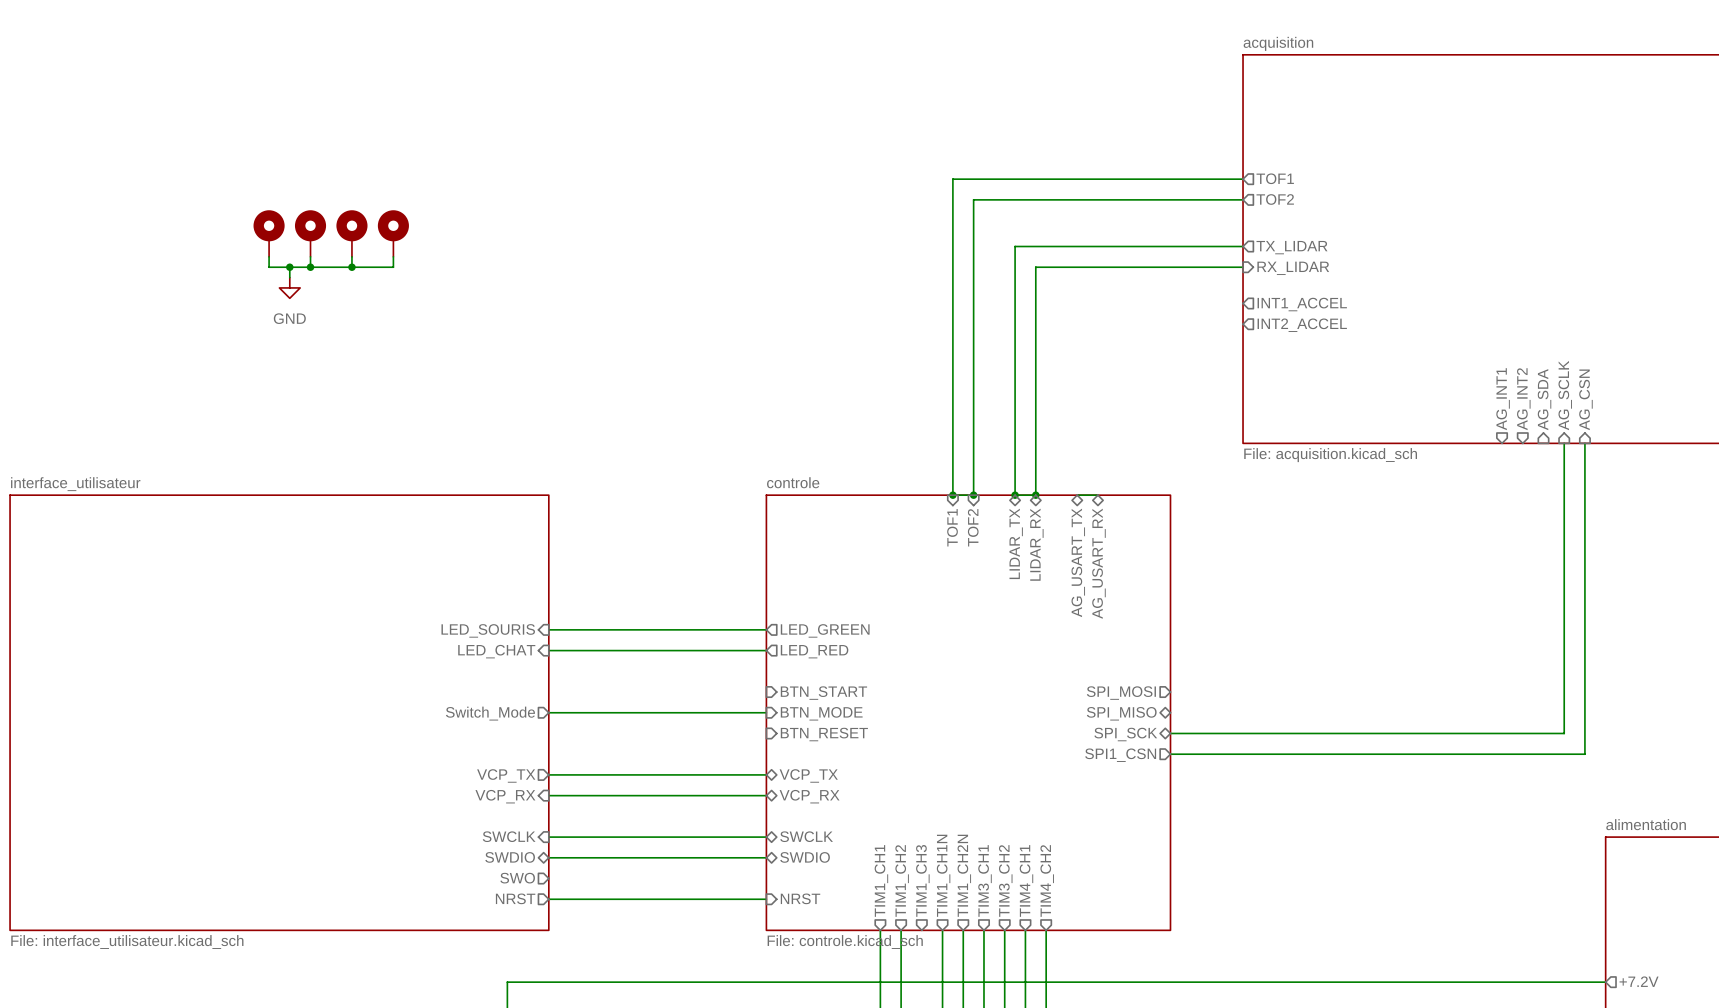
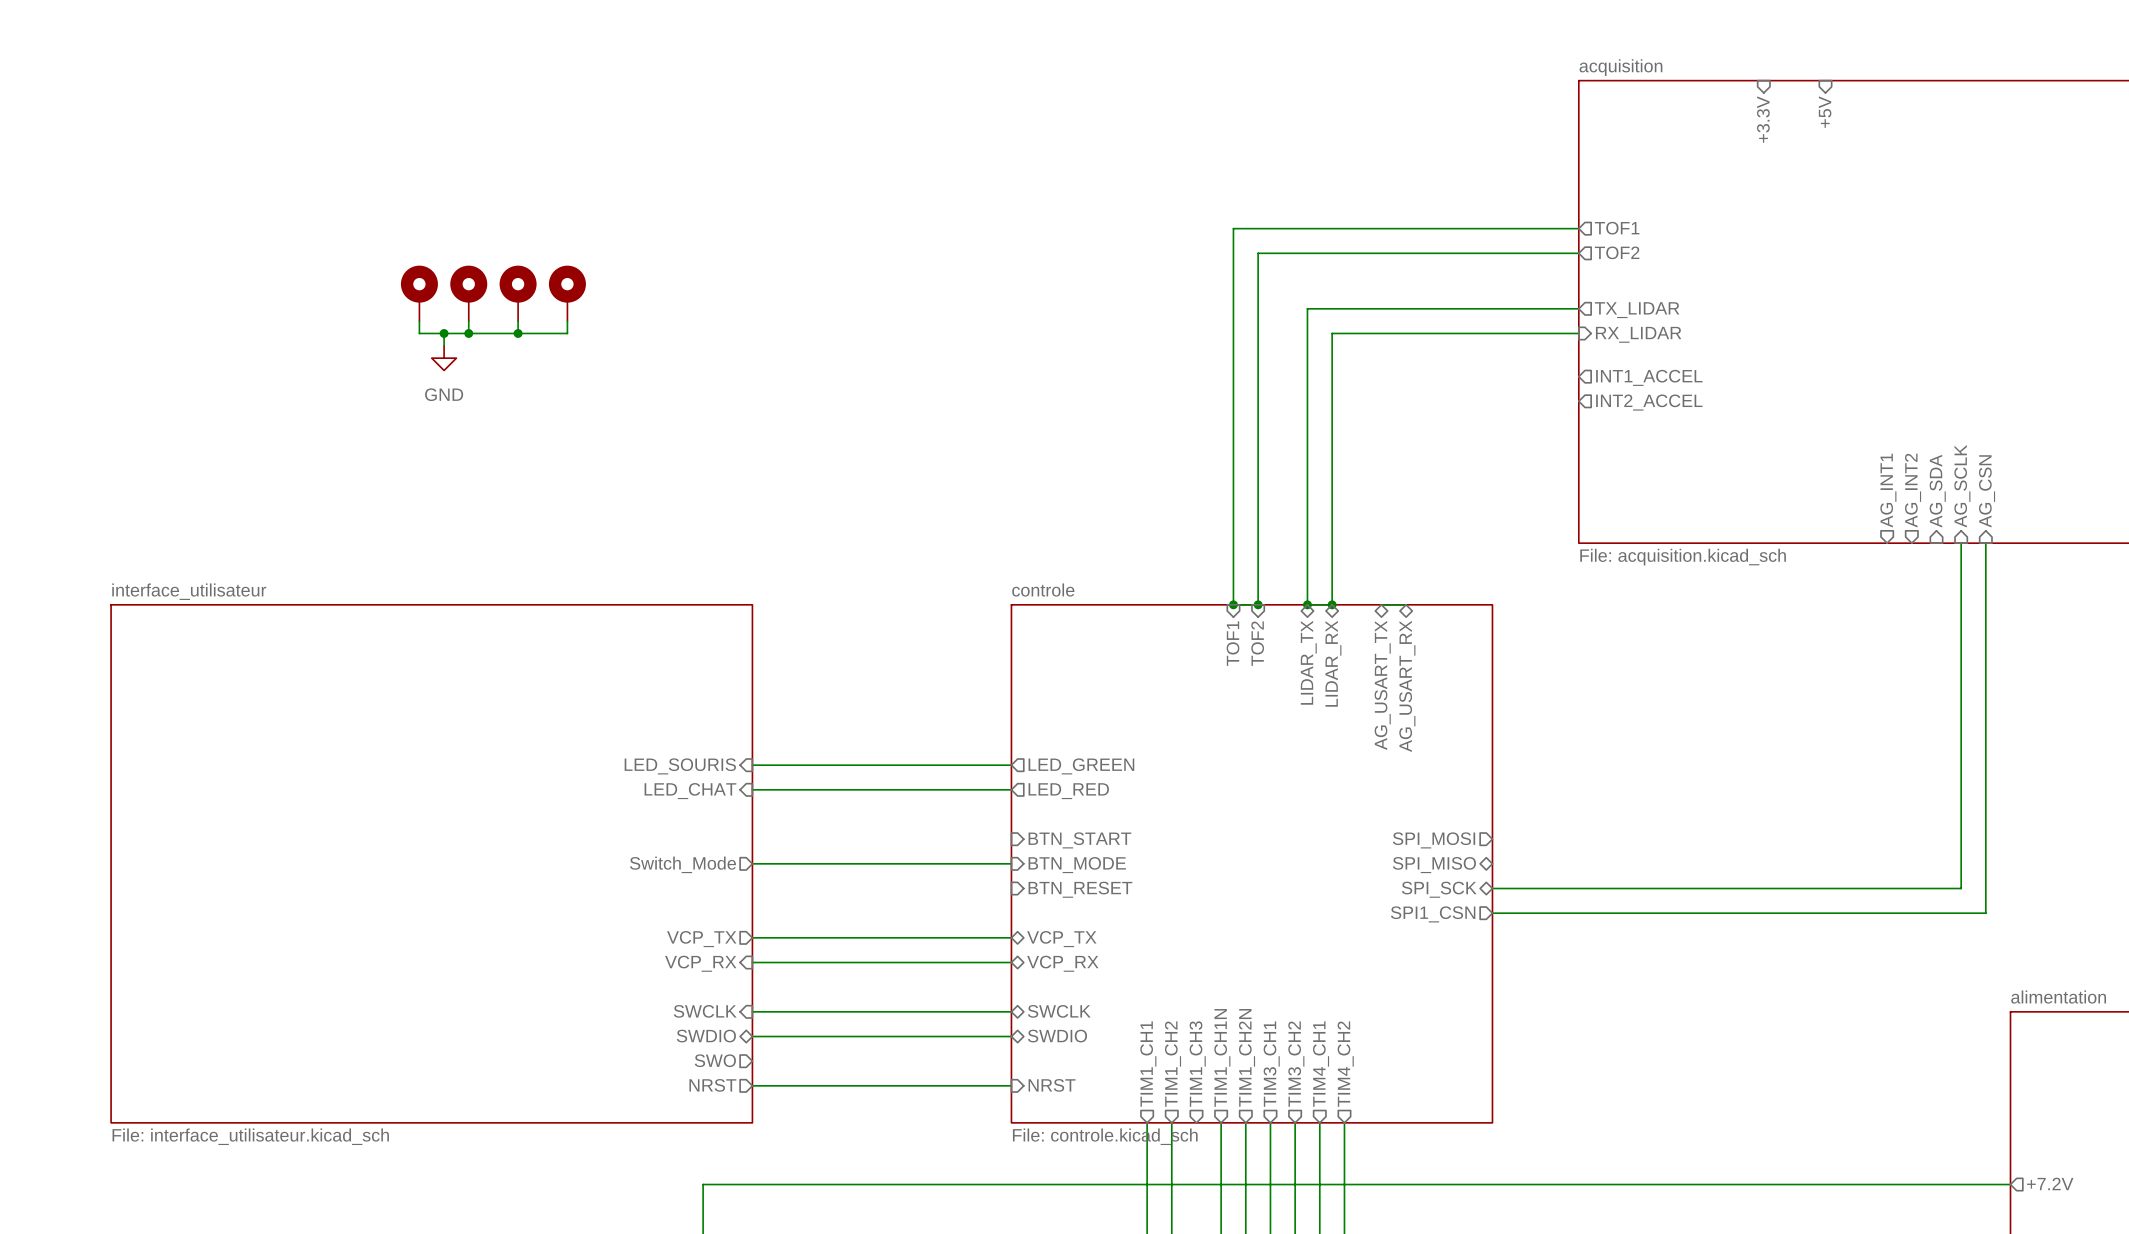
sheet pin: none -> +5V (1825, 112)
sheet pin: none -> +3.3V (1763, 119)

